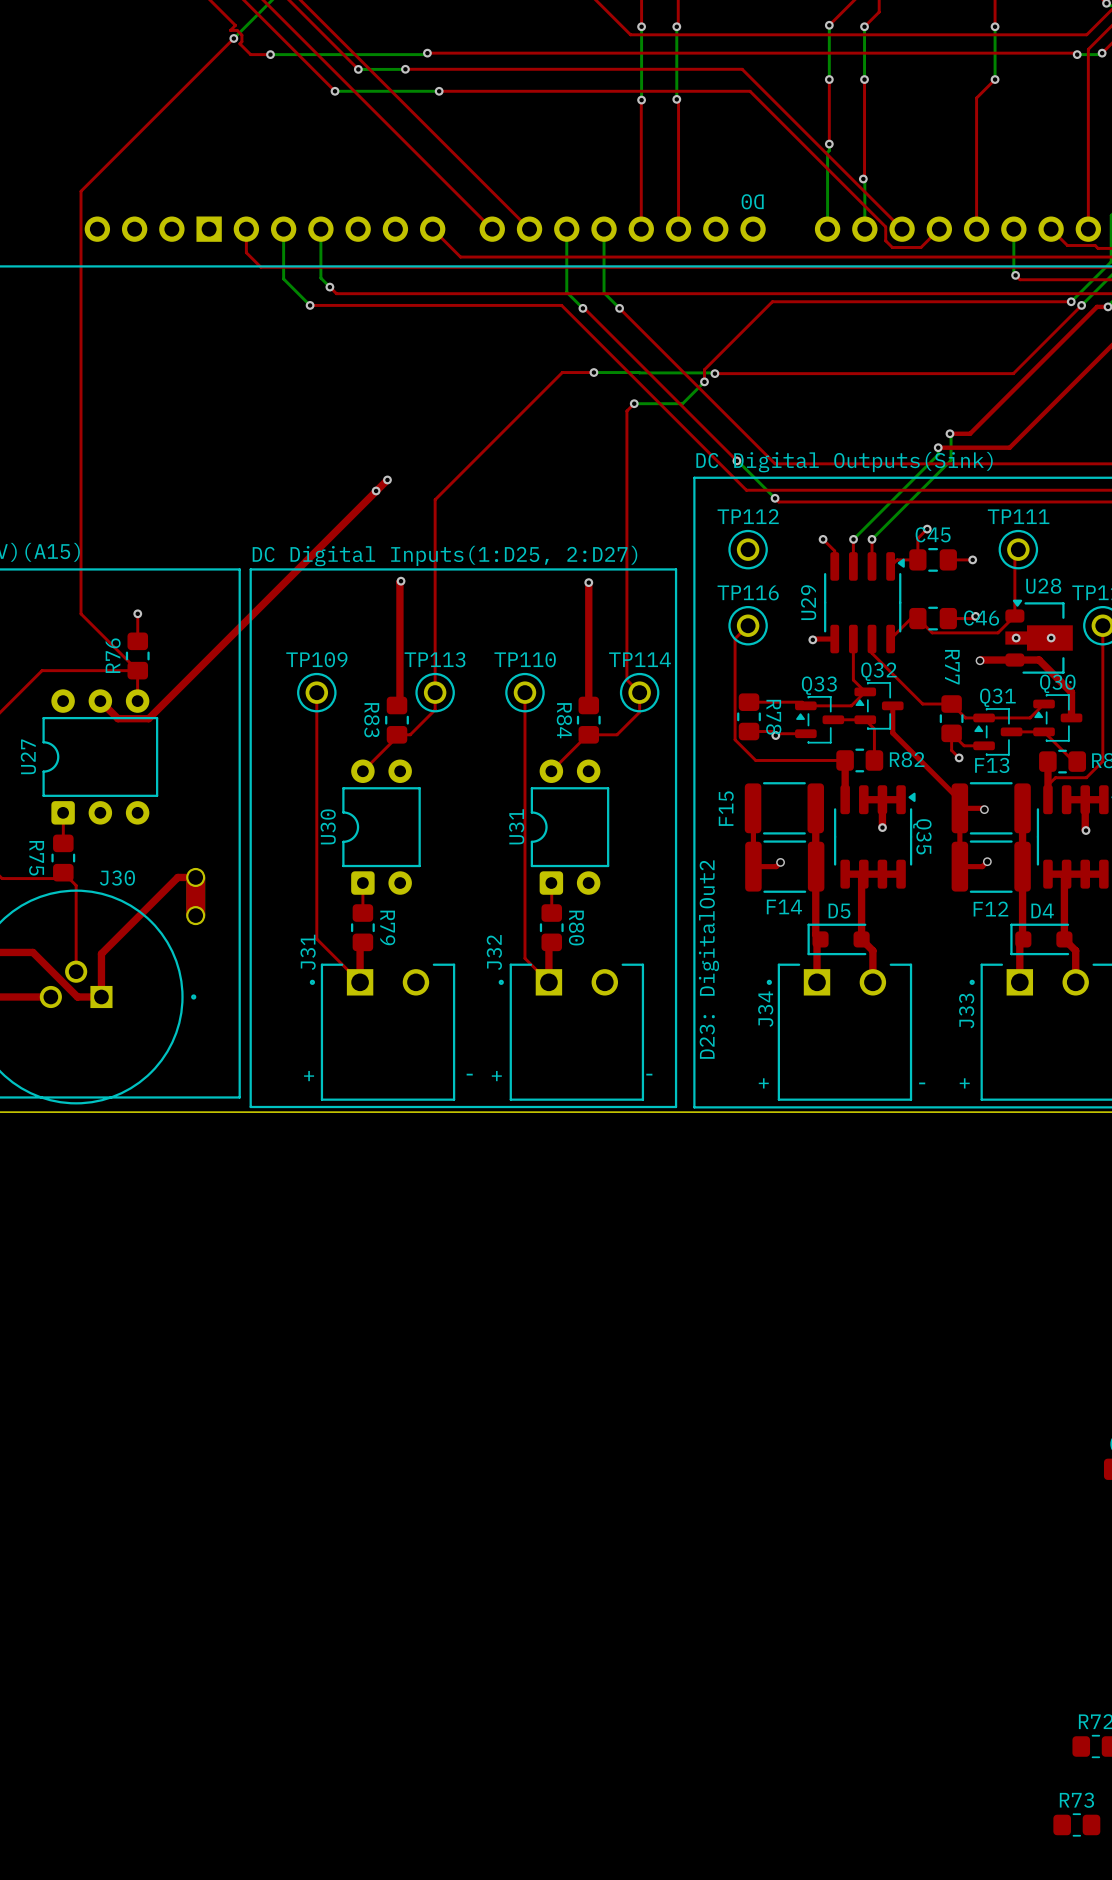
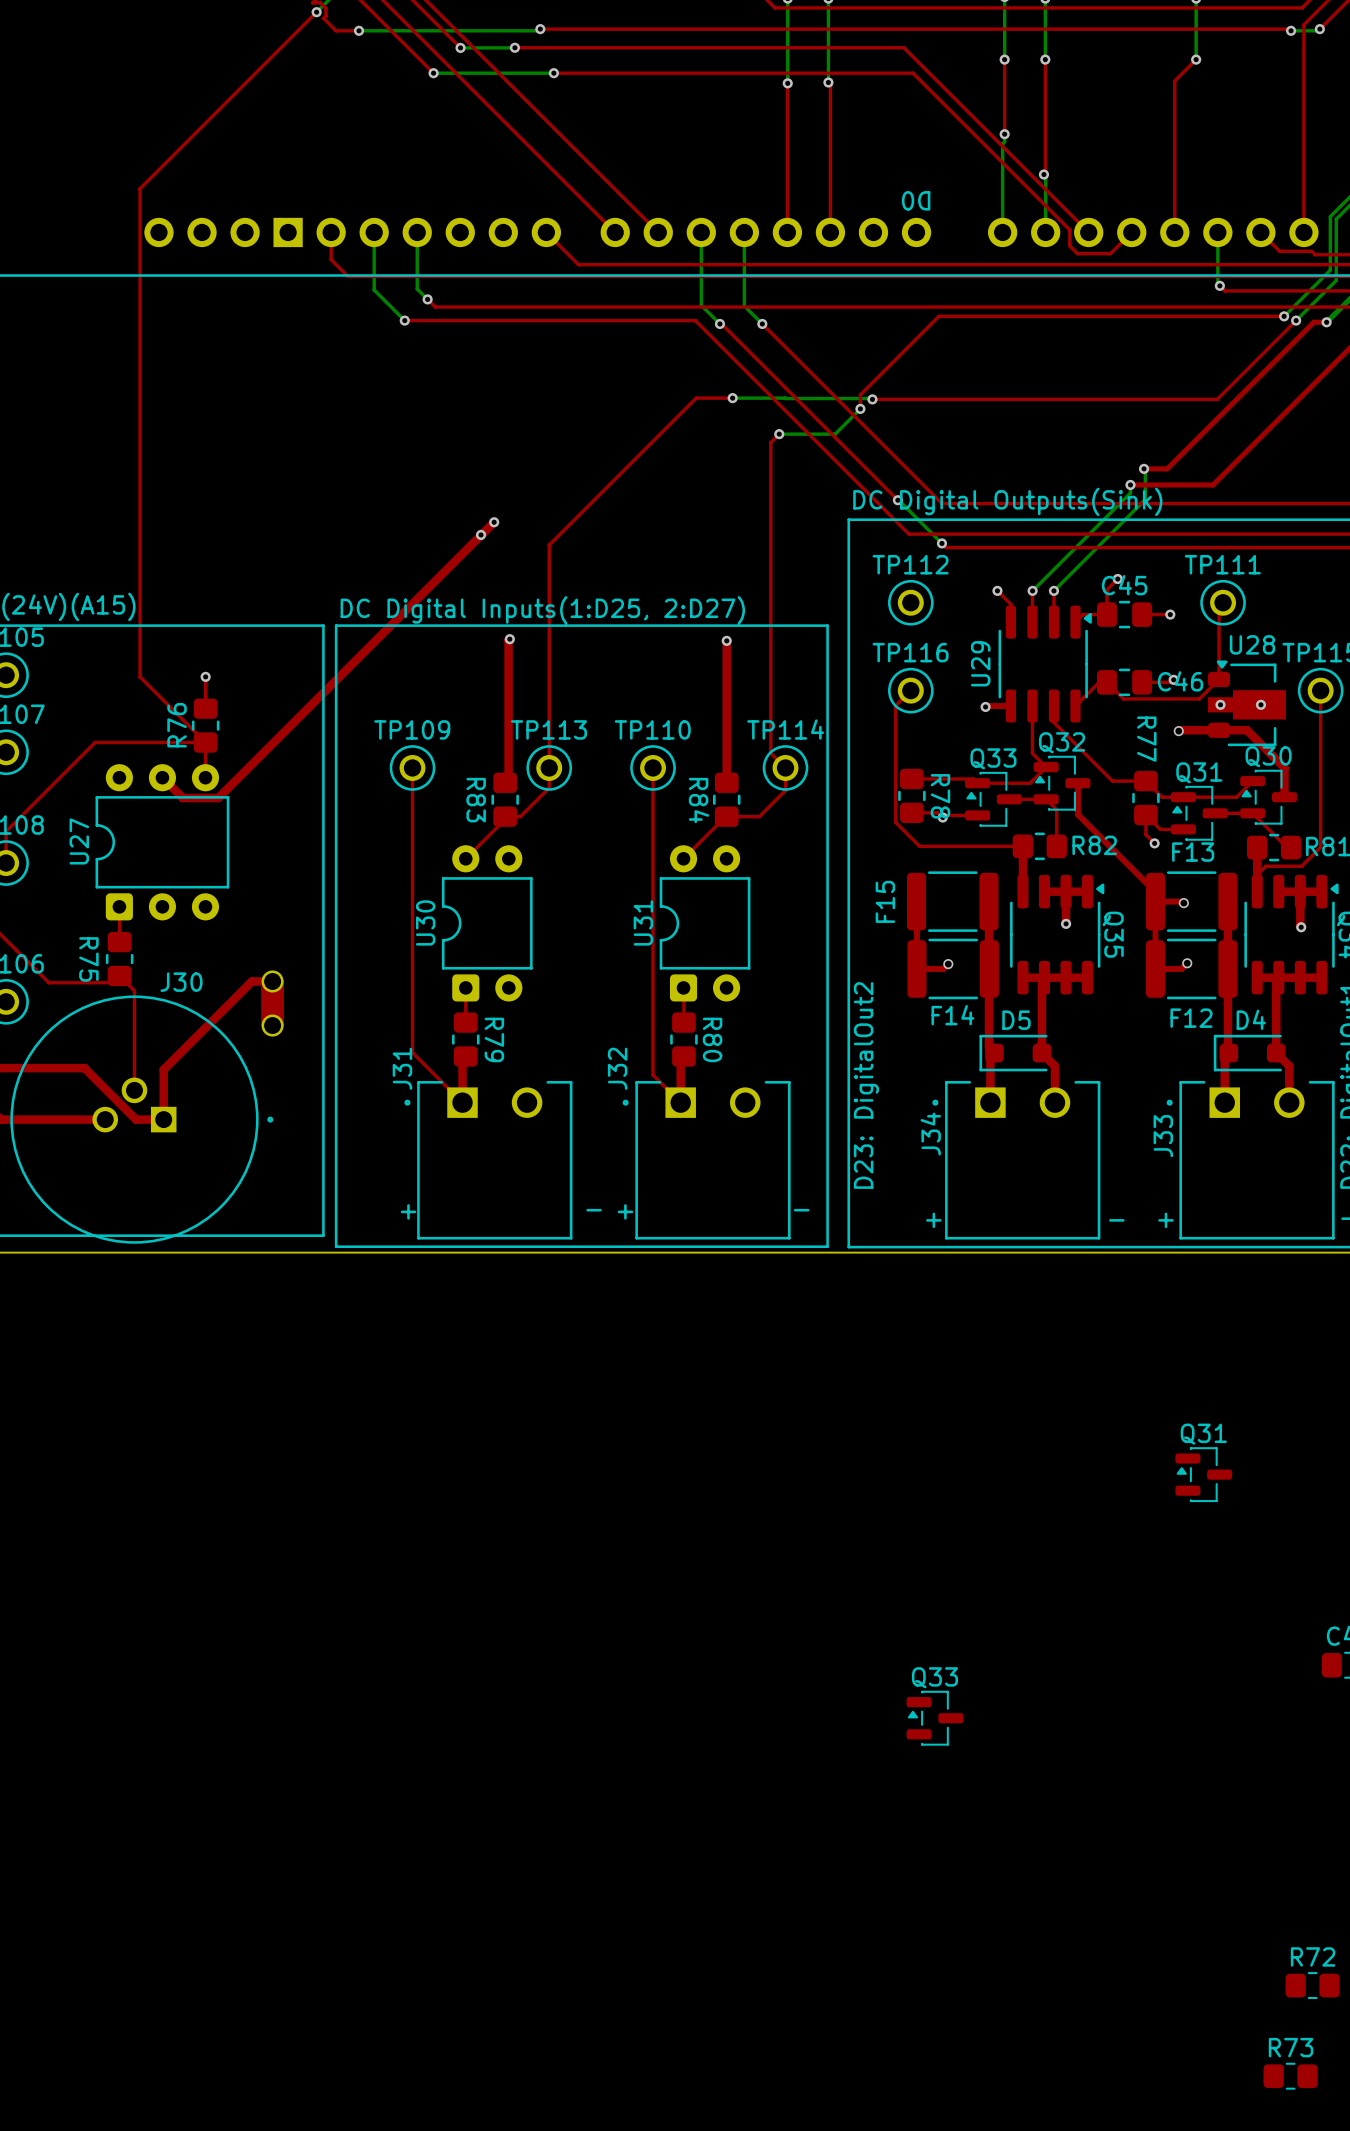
Q31: none -> (1203, 1474)
Q33: none -> (934, 1718)

